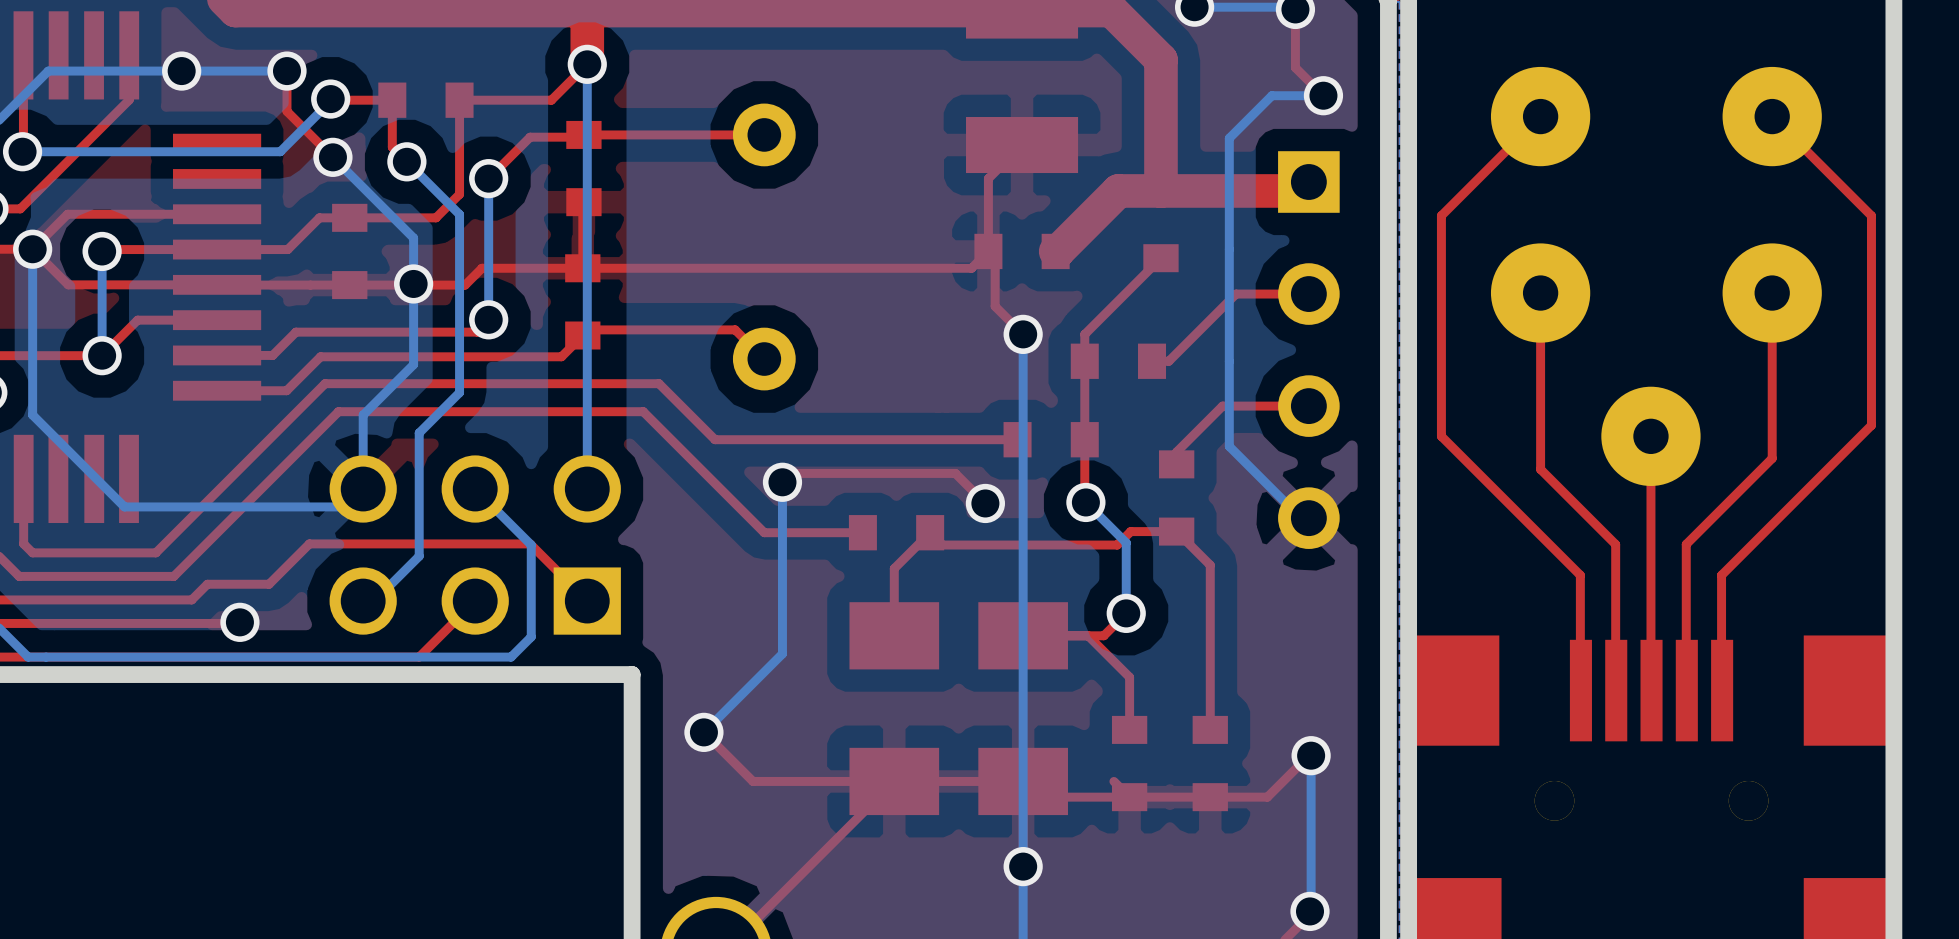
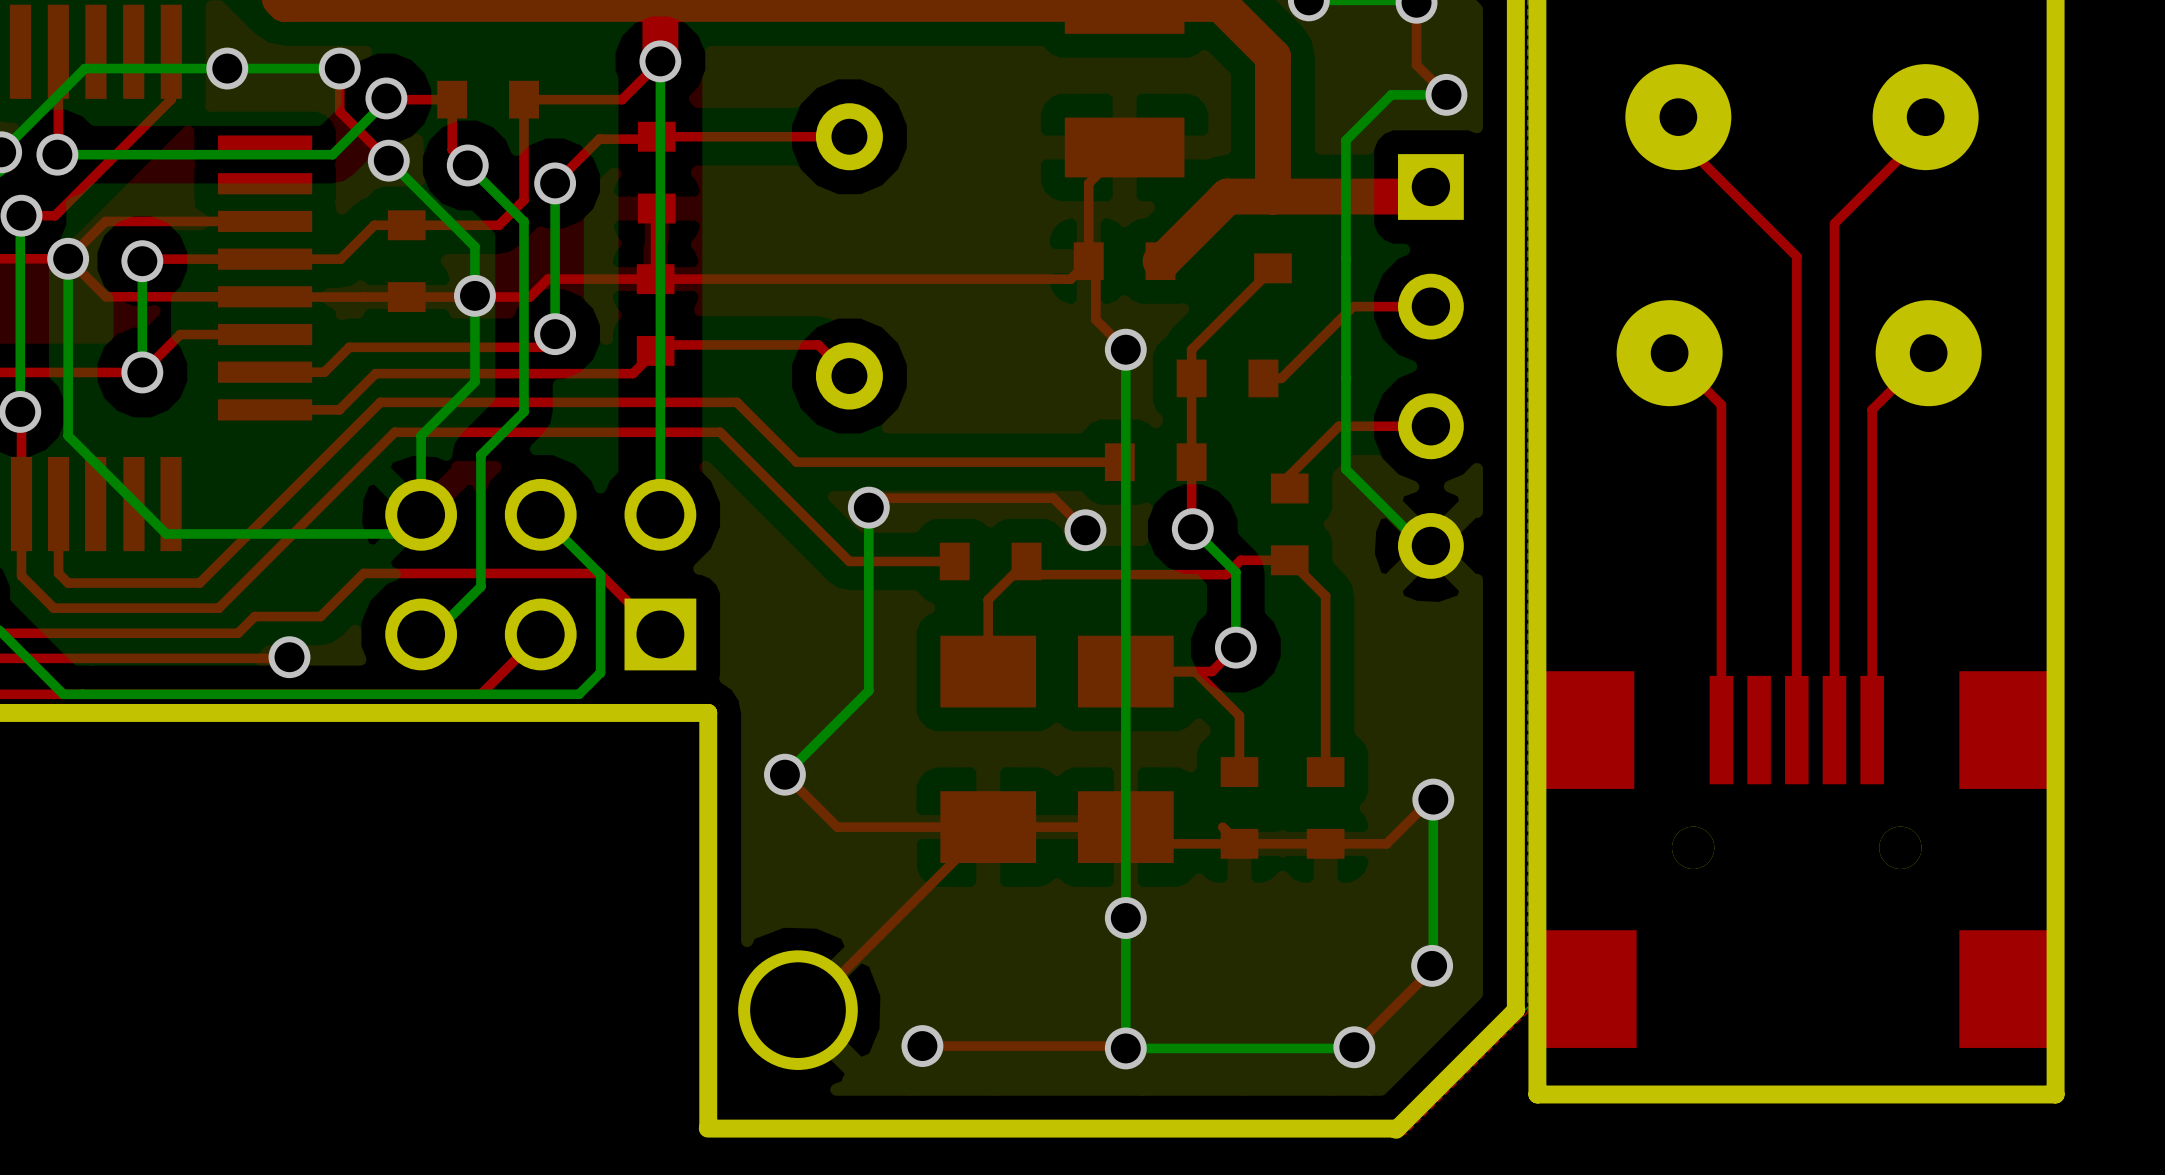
top track: (1540, 116) (1441, 215) (1441, 436) (1580, 575) (1580, 690) -> (1669, 353) (1721, 404) (1721, 730)
top track: (1772, 116) (1871, 215) (1871, 425) (1721, 575) (1721, 690) -> (1928, 353) (1872, 409) (1872, 730)
top track: (1540, 293) (1540, 469) (1615, 544) (1615, 690) -> none
part position: (1540, 293) -> (1669, 353)
top track: (1772, 293) (1772, 458) (1686, 544) (1686, 690) -> (1928, 129) (1834, 223) (1834, 730)
part position: (1772, 293) -> (1928, 353)
top track: (1650, 436) (1650, 690) -> (1669, 129) (1796, 256) (1796, 730)
part: (1650, 436) -> none

